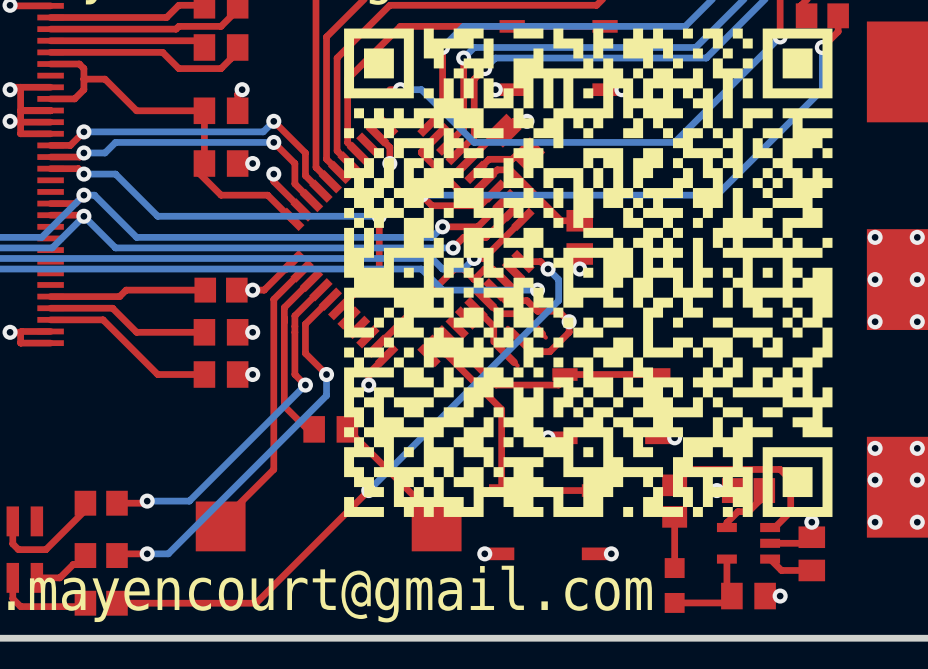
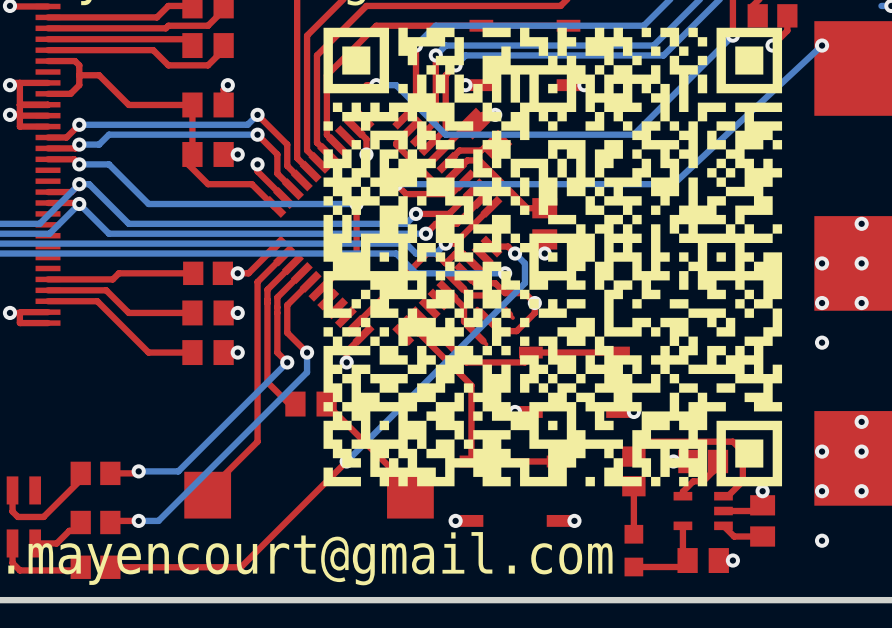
bottom track: (822, 47) (822, 89) (716, 195) -> (822, 45) (673, 184)
via: none -> (822, 45)
via: (875, 237) -> none
via: none -> (822, 342)
via: (875, 448) -> none
via: none -> (822, 540)

